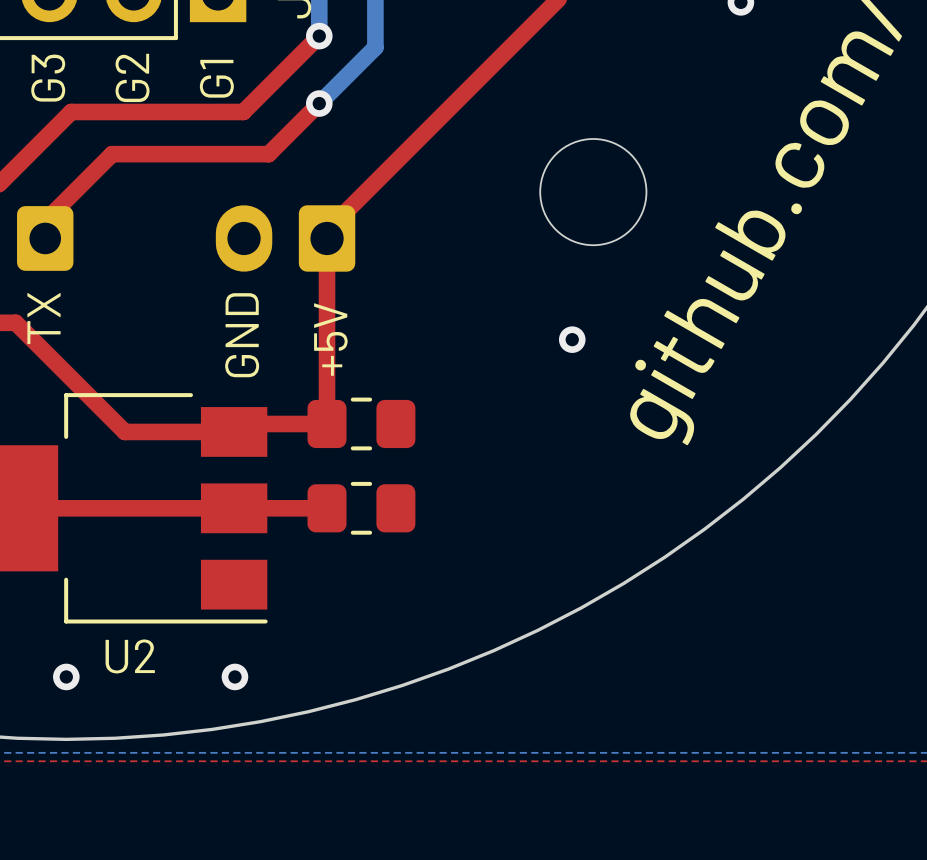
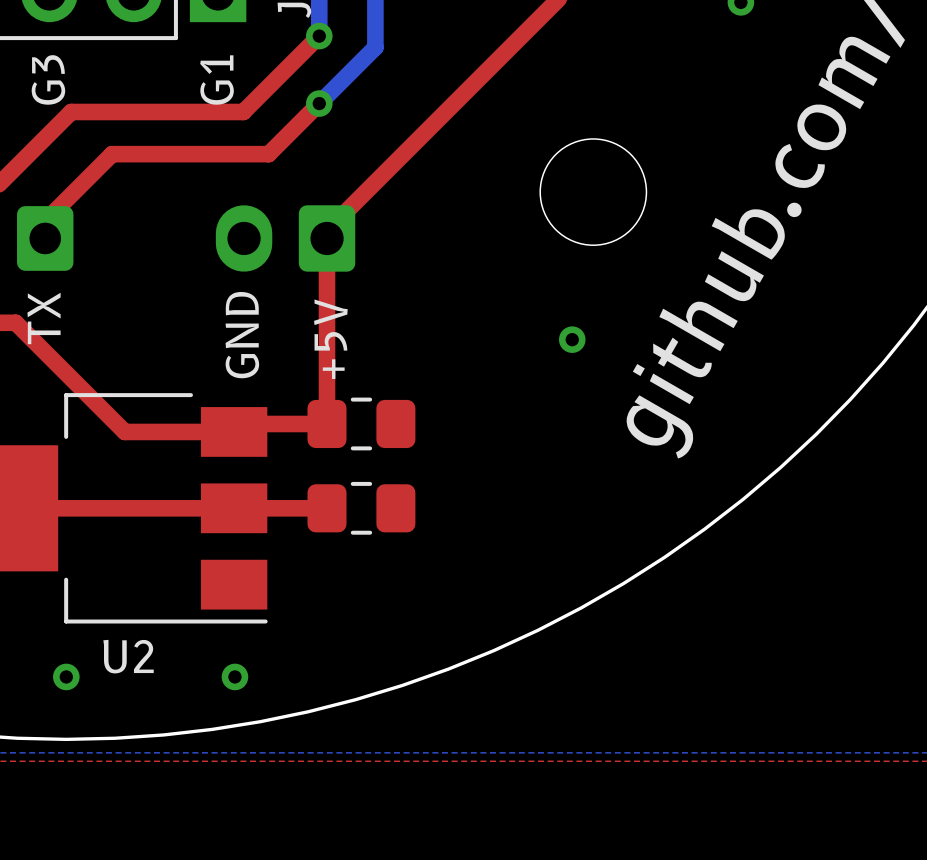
text: G2 (132, 77) -> none

